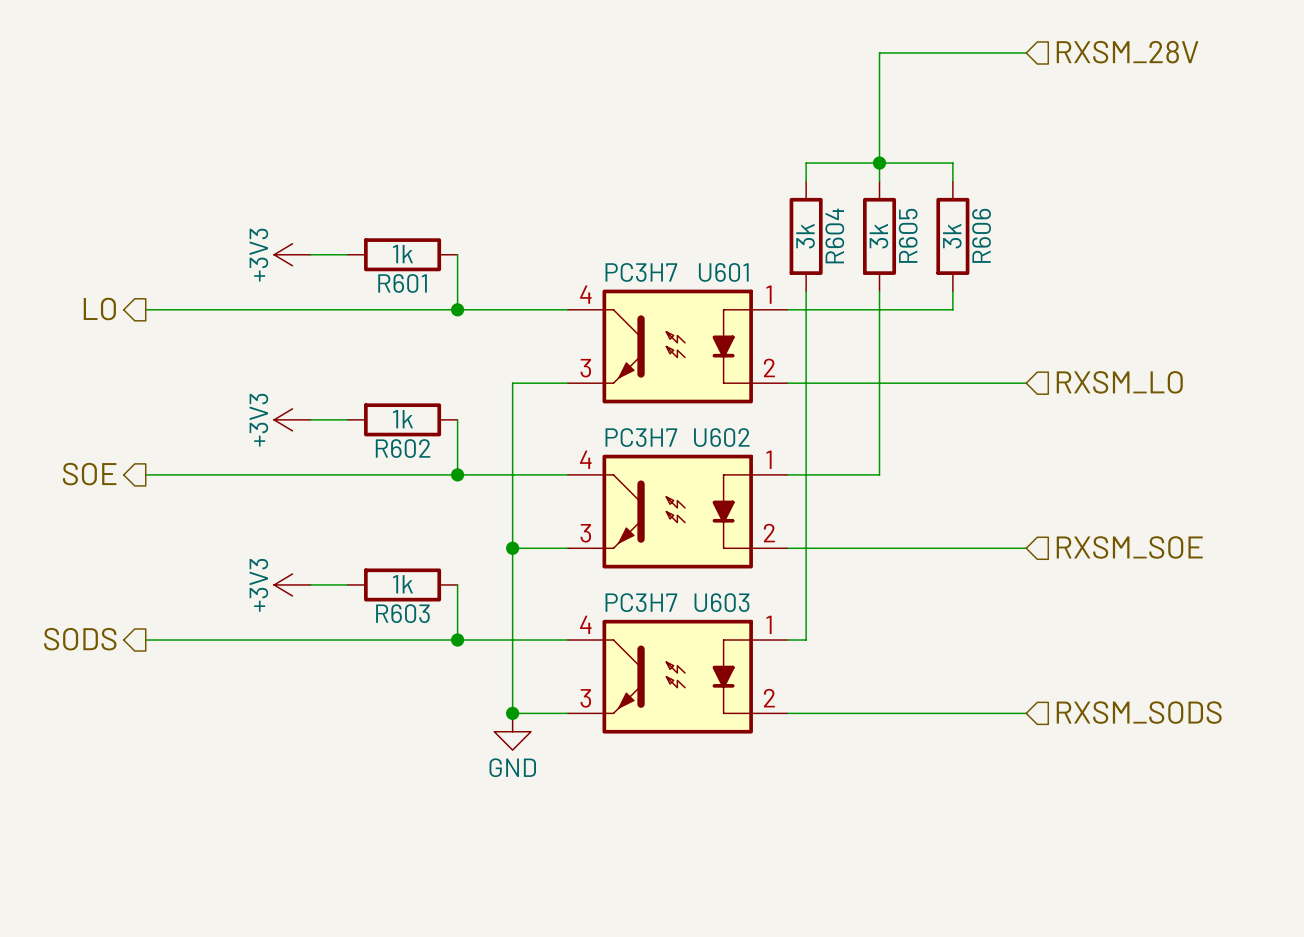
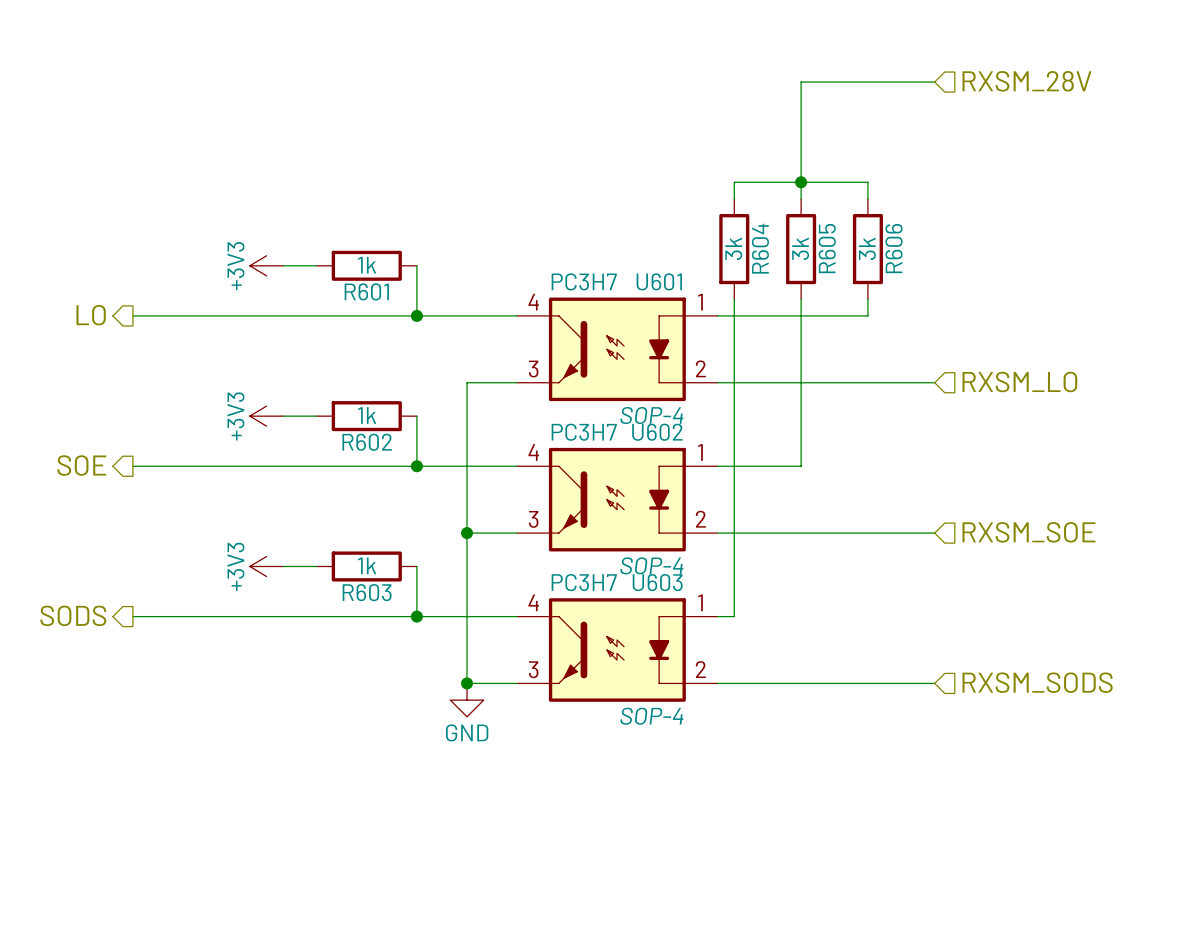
U601 text: none -> SOP-4 (651, 415)
U602 text: none -> SOP-4 (651, 565)
U603 text: none -> SOP-4 (651, 716)

